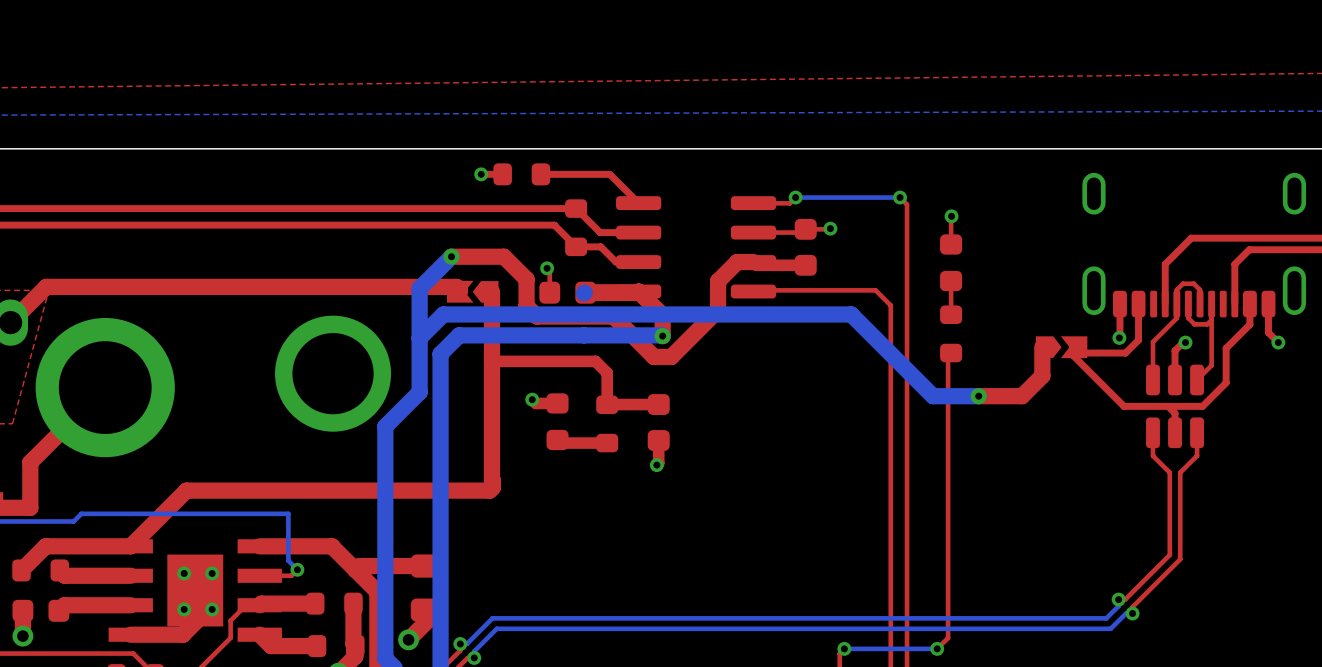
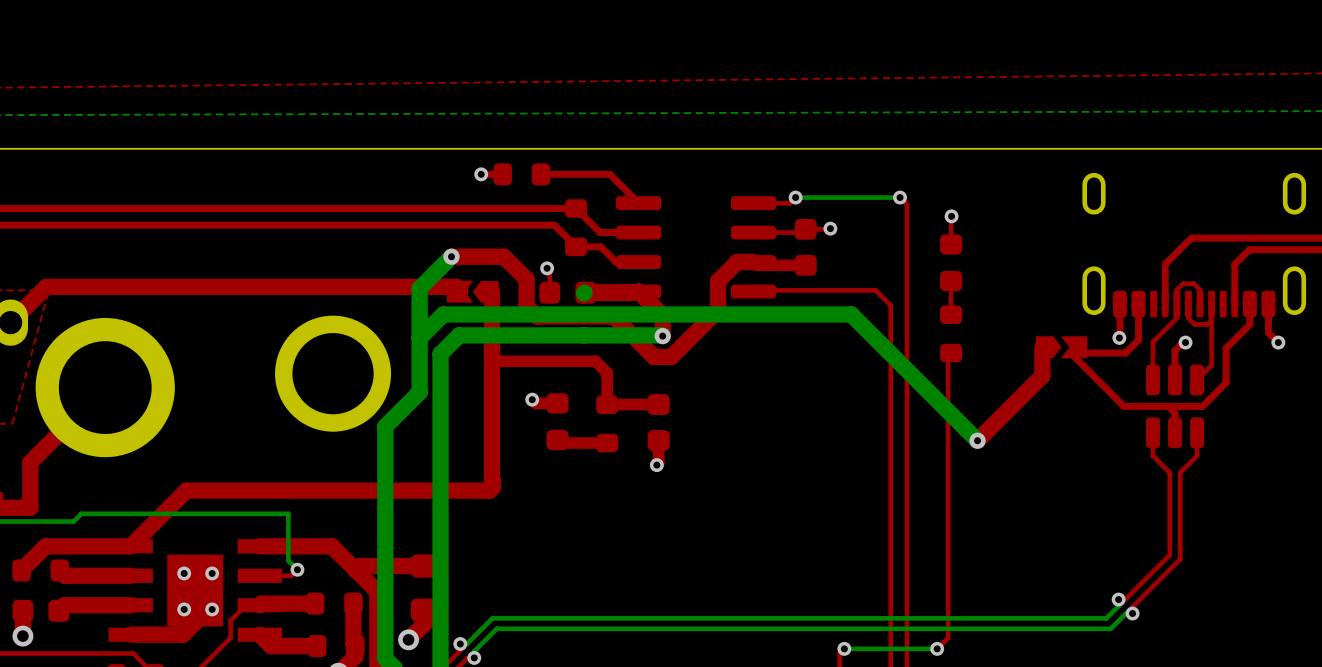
bottom track: (978, 396) (933, 396) -> (977, 440) (933, 396)
via position: (978, 396) -> (977, 440)
top track: (1022, 396) (978, 396) -> (1022, 396) (977, 440)

